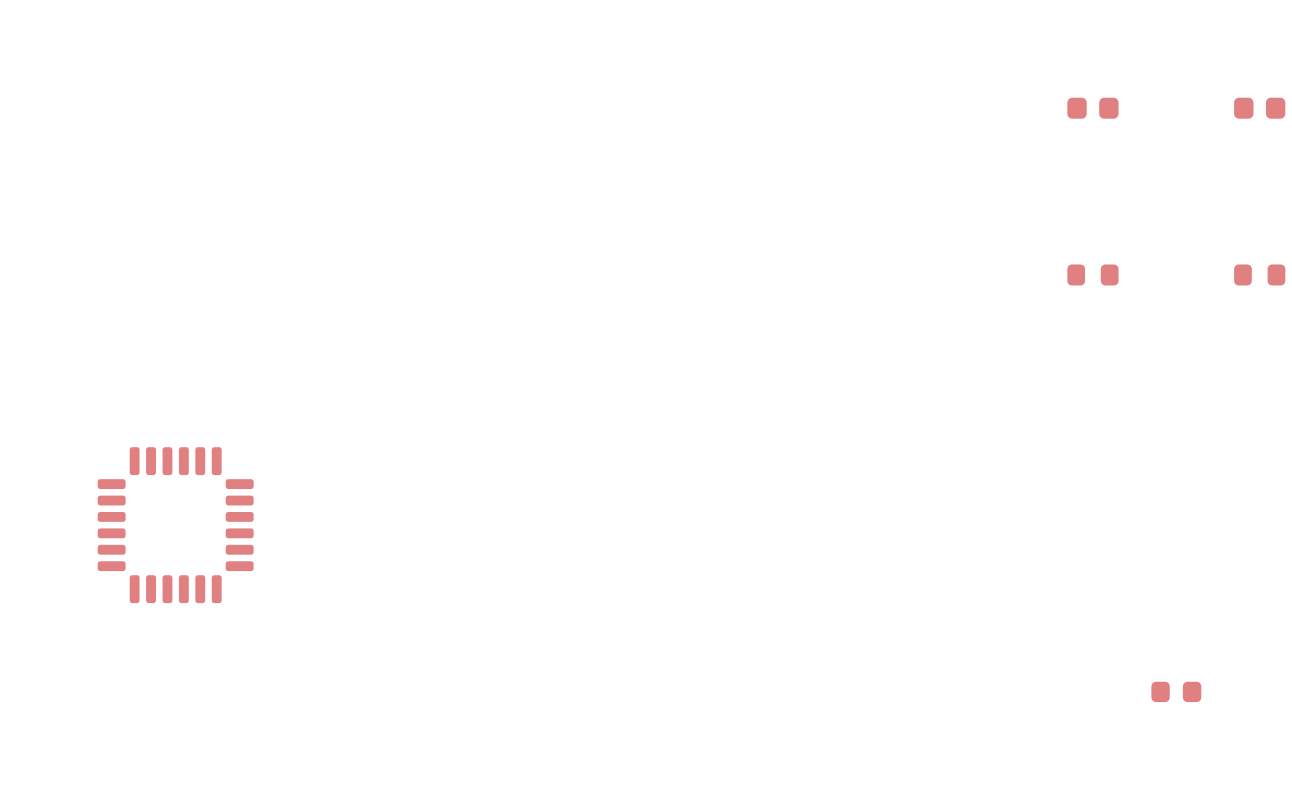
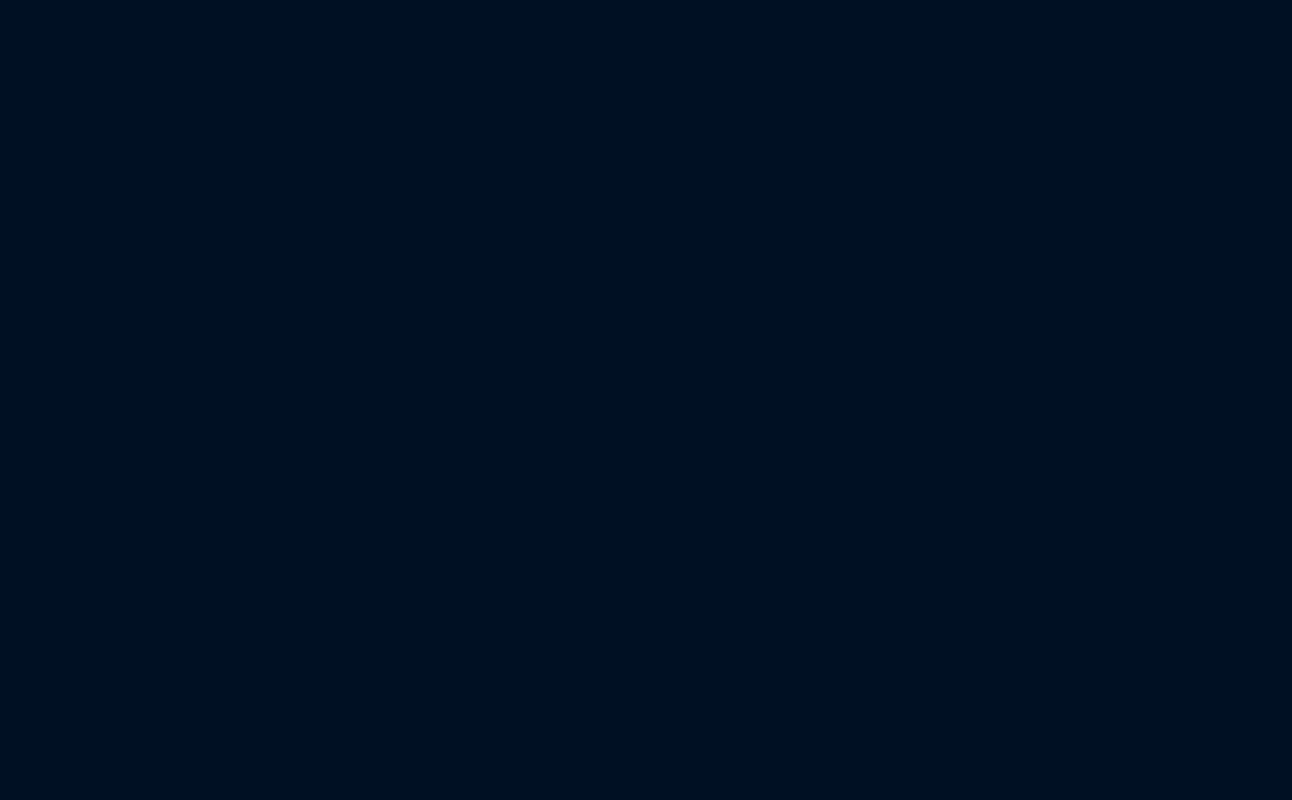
part: (1092, 108) -> none
part: (1259, 108) -> none
part: (1092, 274) -> none
part: (1259, 274) -> none
part: (175, 525) -> none
part: (1176, 691) -> none

